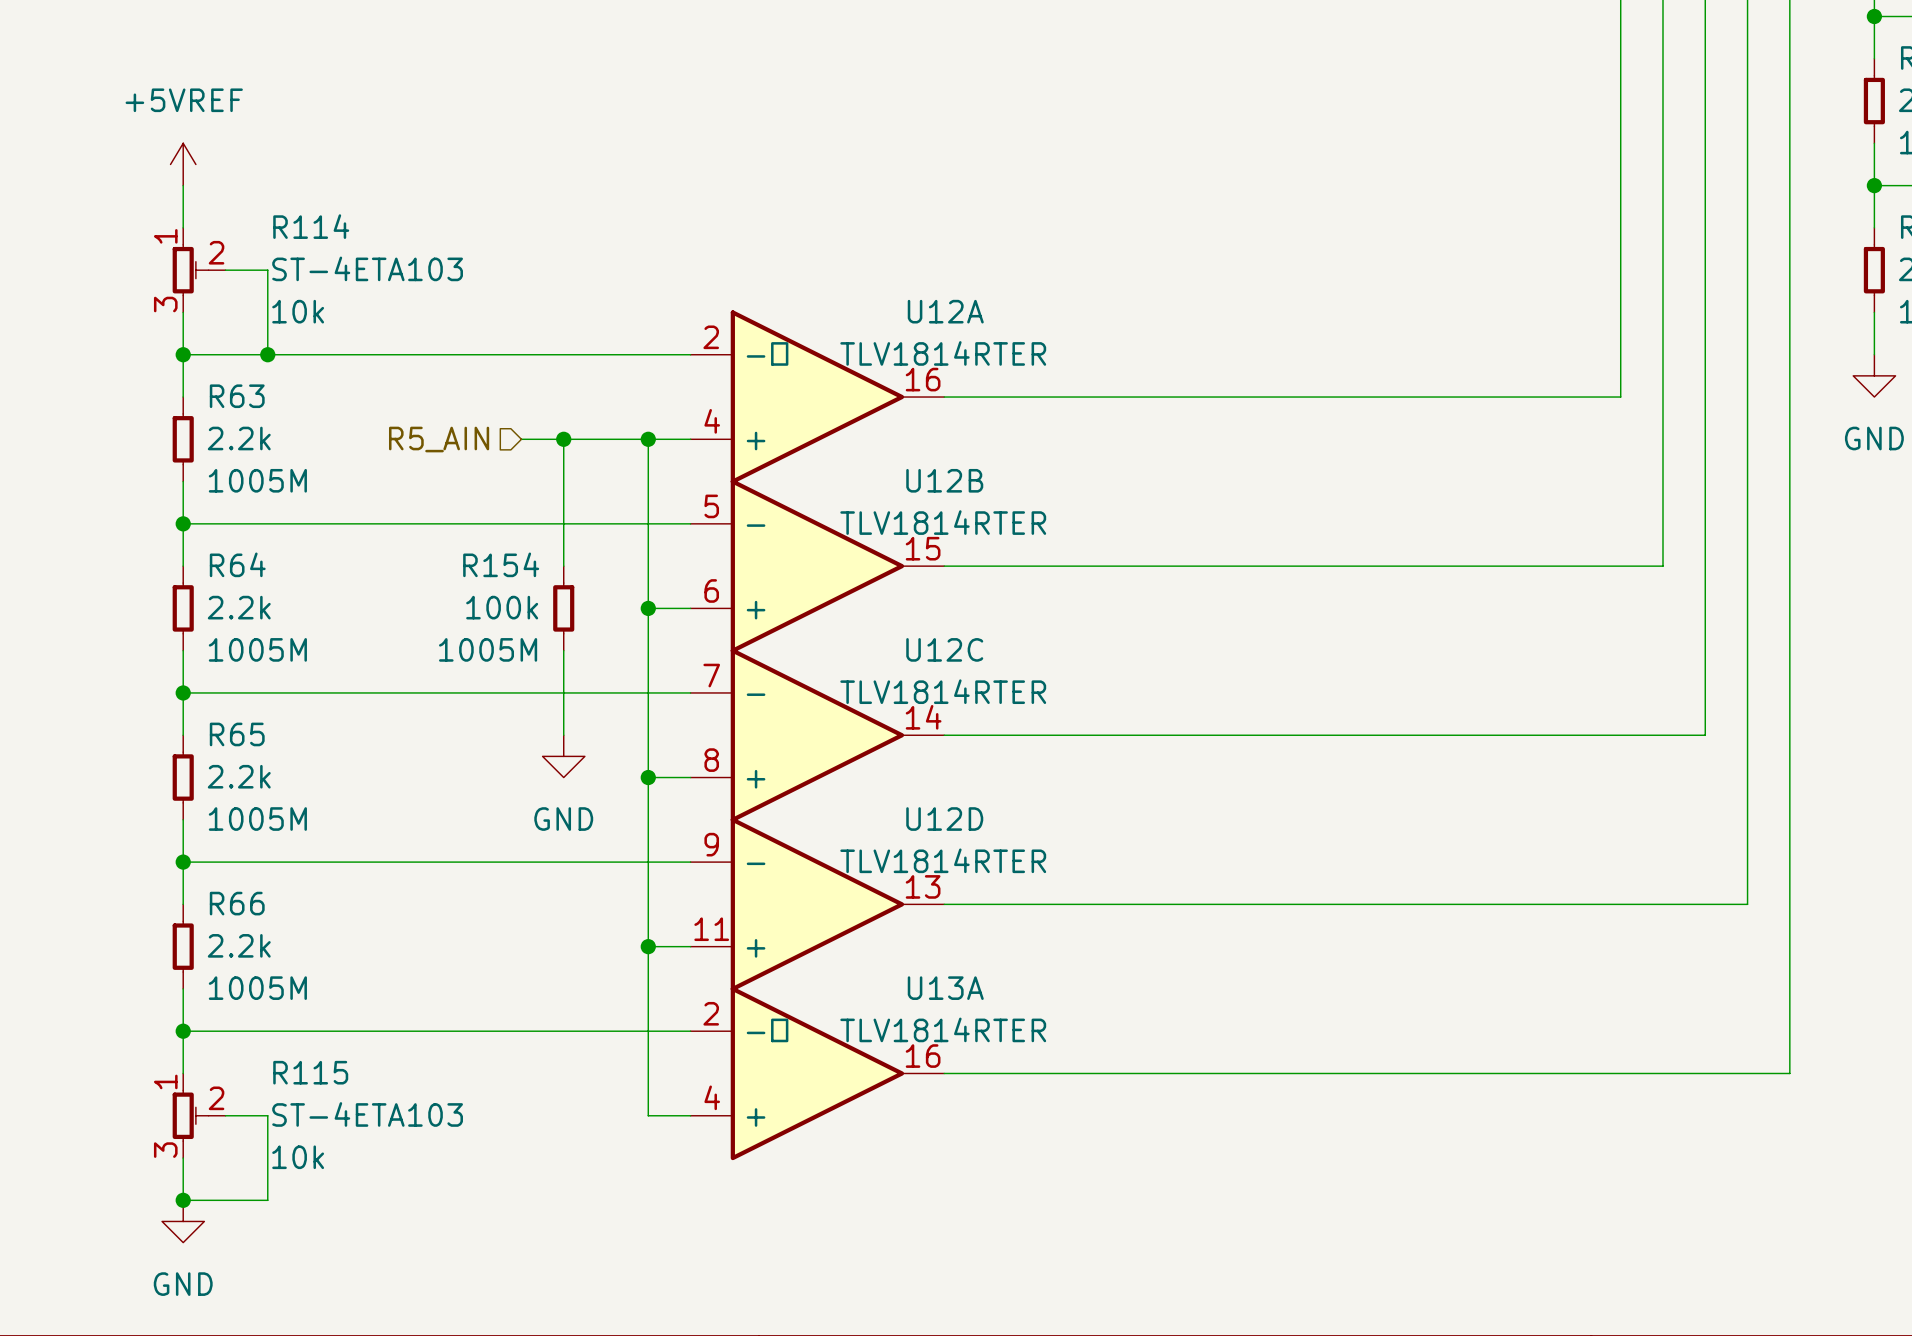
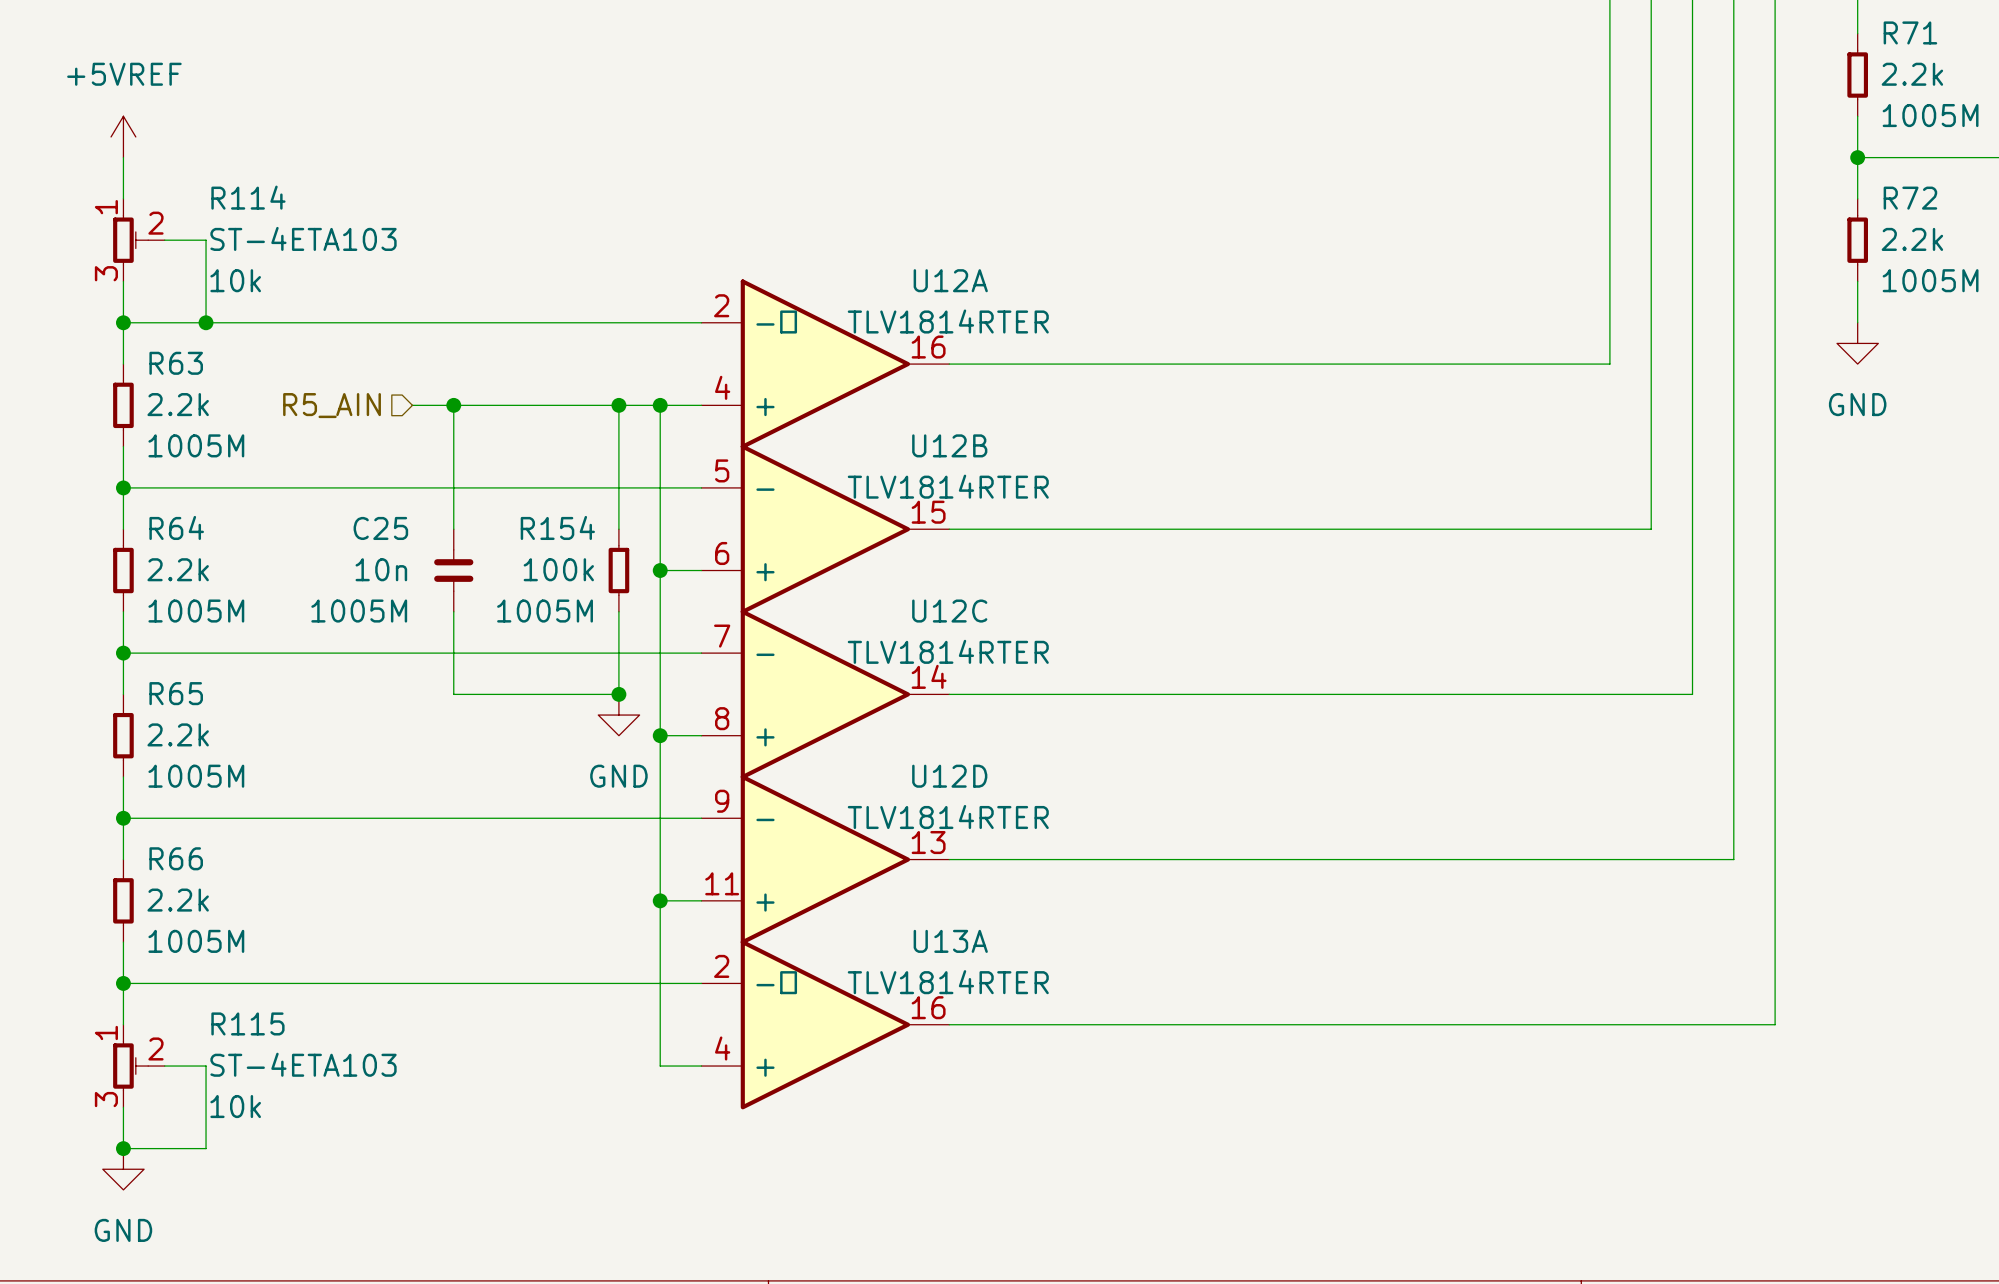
power symbol position: +5VREF (183, 164) -> +5VREF (123, 136)
wire: (183, 185) (183, 227) -> (123, 157) (123, 198)
wire: none -> (164, 240) (206, 240) (206, 281)
R114 position: (199, 270) -> (138, 240)
wire: (225, 270) (267, 270) (267, 354) -> none
wire: none -> (123, 281) (123, 364)
junction: none -> (123, 322)
wire: (183, 354) (183, 397) -> (206, 322) (123, 322)
junction: (267, 354) -> none
R63 position: (183, 439) -> (123, 405)
wire: none -> (412, 405) (536, 405)
wire: none -> (453, 405) (453, 529)
junction: none -> (453, 405)
hierarchical label position: R5_AIN (439, 439) -> R5_AIN (332, 405)
wire: (563, 439) (563, 566) -> (618, 405) (618, 529)
junction position: (563, 439) -> (618, 405)
wire: (183, 481) (183, 566) -> (123, 446) (123, 529)
wire: none -> (123, 487) (206, 487)
junction position: (183, 523) -> (123, 487)
R64 position: (183, 608) -> (123, 570)
C25: none -> 10n (453, 570)
R154 position: (563, 608) -> (618, 570)
wire: (183, 650) (183, 735) -> (123, 611) (123, 694)
wire: none -> (453, 611) (453, 694) (618, 694) (618, 611)
wire: (563, 650) (563, 735) -> none
wire: none -> (123, 653) (206, 653)
junction position: (183, 692) -> (123, 653)
junction: none -> (618, 694)
power symbol position: GND (563, 756) -> GND (618, 715)
R65 position: (183, 777) -> (123, 735)
wire: (183, 819) (183, 904) -> (123, 776) (123, 859)
wire: none -> (123, 818) (206, 818)
junction position: (183, 862) -> (123, 818)
R66 position: (183, 946) -> (123, 900)
wire: (183, 988) (183, 1073) -> (123, 942) (123, 1024)
wire: none -> (123, 983) (206, 983)
junction position: (183, 1031) -> (123, 983)
wire: none -> (164, 1066) (206, 1066) (206, 1107)
R115 position: (199, 1115) -> (138, 1066)
wire: (225, 1115) (267, 1115) (267, 1200) (183, 1200) -> (123, 1107) (123, 1148) (206, 1148)
junction position: (183, 1200) -> (123, 1148)
power symbol position: GND (183, 1221) -> GND (123, 1169)

